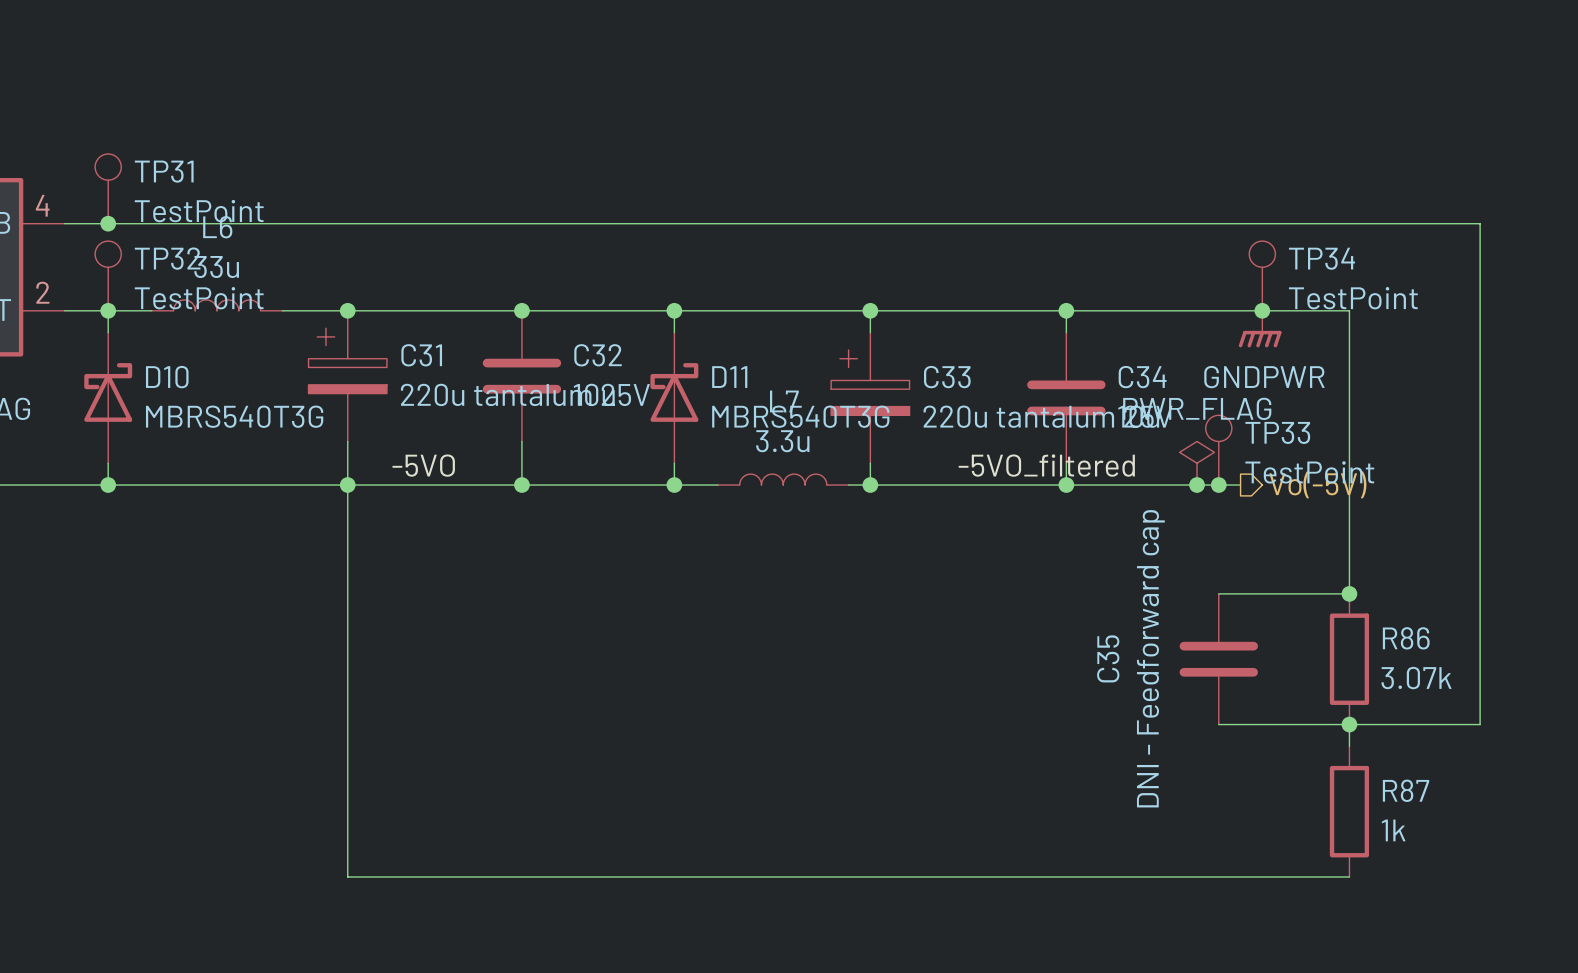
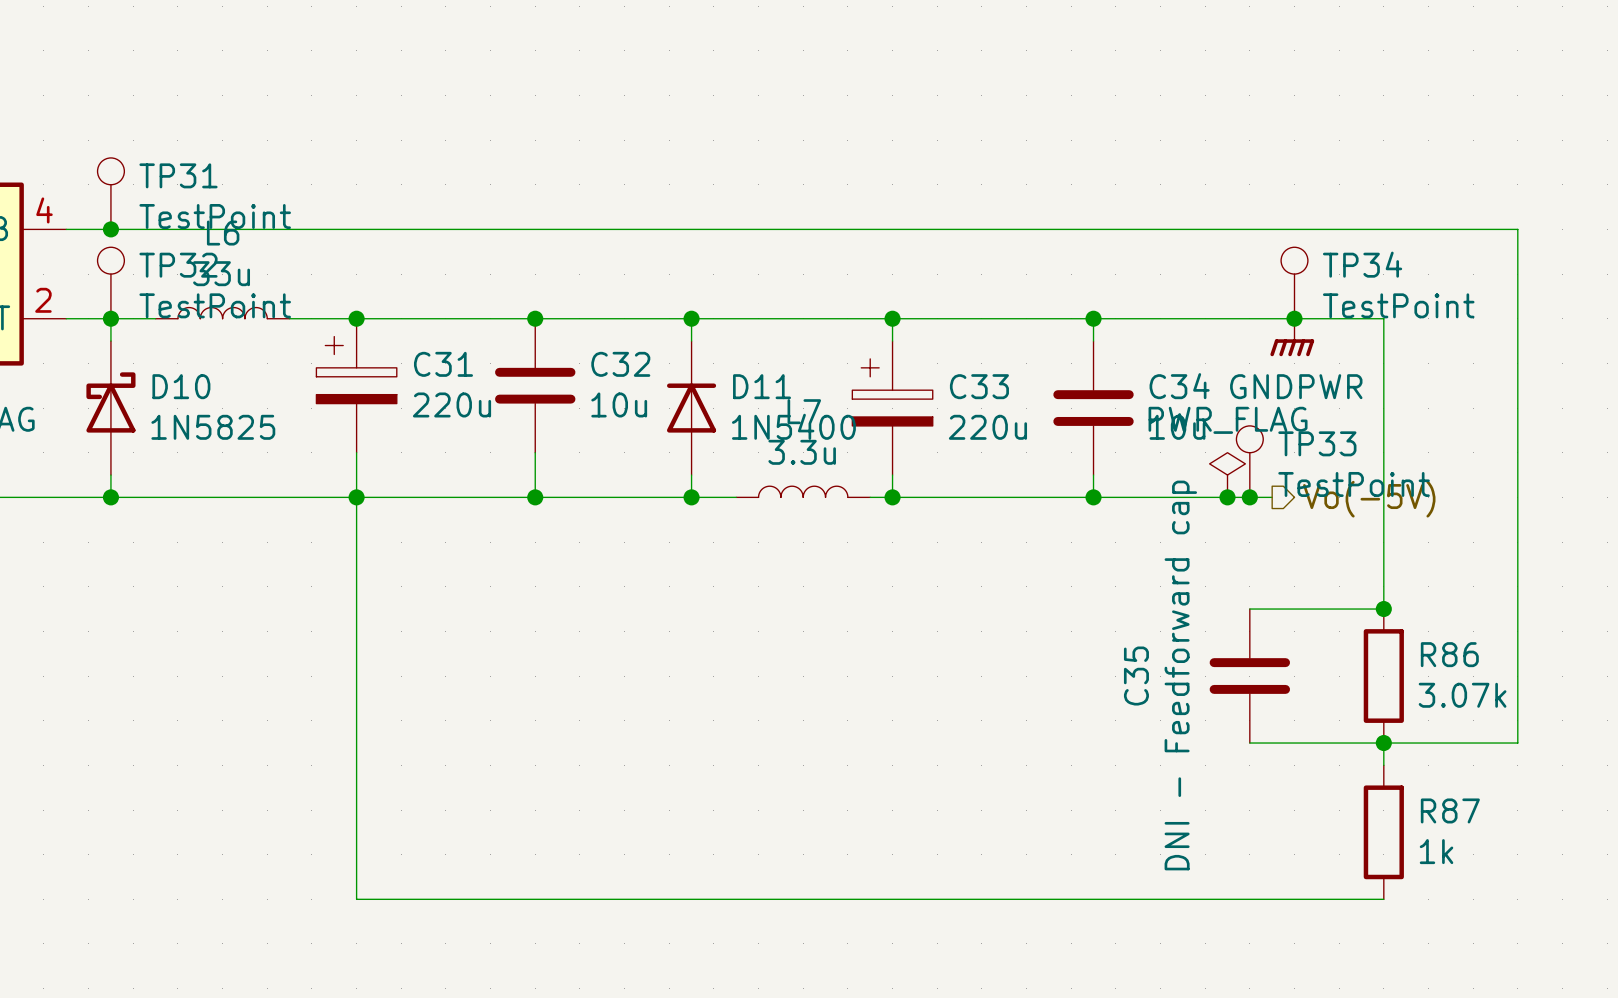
D11 symbol: [650, 332, 699, 464] -> [666, 341, 717, 476]
C31 value: 220u tantalum 25V (525, 394) -> 220u (452, 404)
D10 value: MBRS540T3G (234, 416) -> 1N5825 (213, 427)
D11 value: MBRS540T3G (800, 416) -> 1N5400 (793, 426)
C33 value: 220u tantalum 25V (1048, 416) -> 220u (987, 427)
label: -5VO (423, 465) -> none
label: -5VO_filtered (1046, 465) -> none

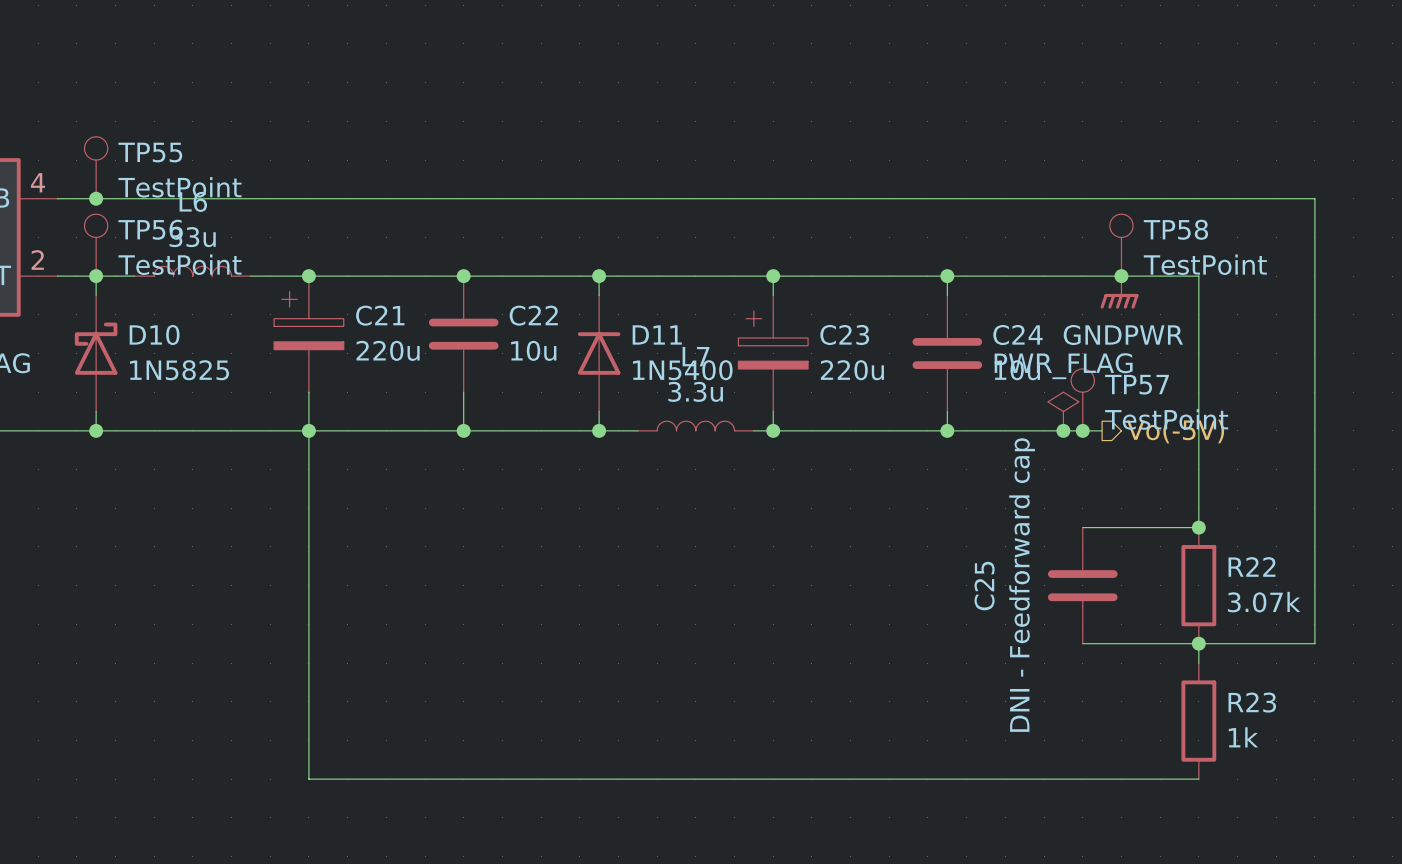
TP31 name: TP31 (178, 175) -> TP55 (150, 152)
TP34 name: TP34 (1362, 264) -> TP58 (1175, 229)
TP32 name: TP32 (178, 265) -> TP56 (150, 229)
C31 name: C31 (443, 364) -> C21 (380, 315)
C32 name: C32 (620, 364) -> C22 (533, 315)
C33 name: C33 (979, 386) -> C23 (844, 334)
C34 name: C34 (1179, 386) -> C24 (1017, 334)
TP33 name: TP33 (1317, 443) -> TP57 (1137, 384)
R86 name: R86 (1449, 654) -> R22 (1252, 566)
C35 name: C35 (1136, 676) -> C25 (984, 586)
R87 name: R87 (1450, 810) -> R23 (1252, 702)

